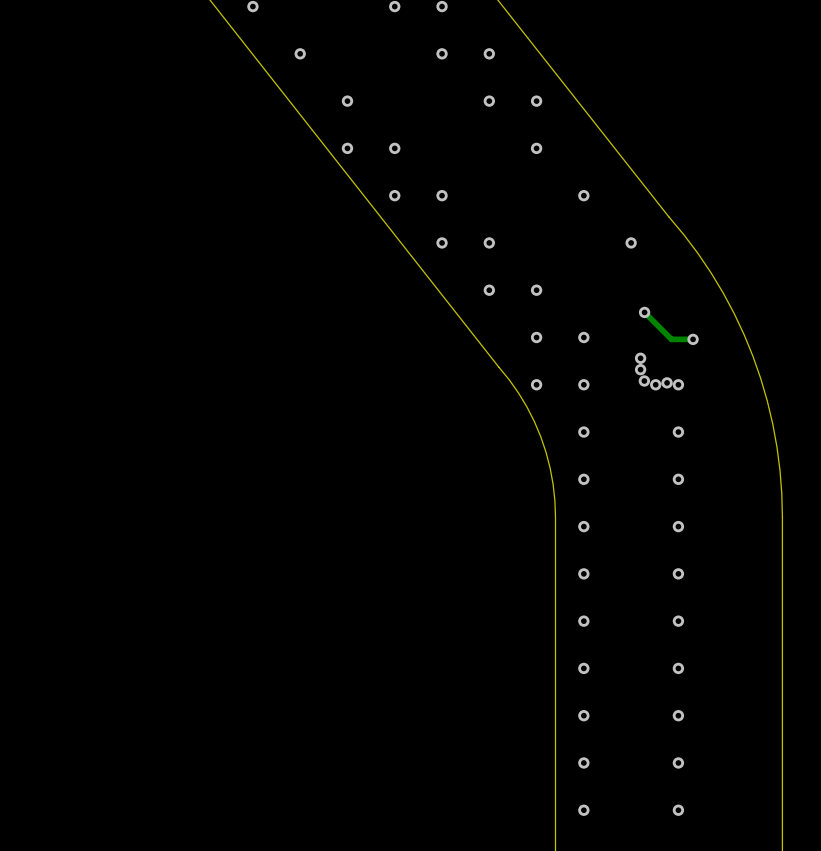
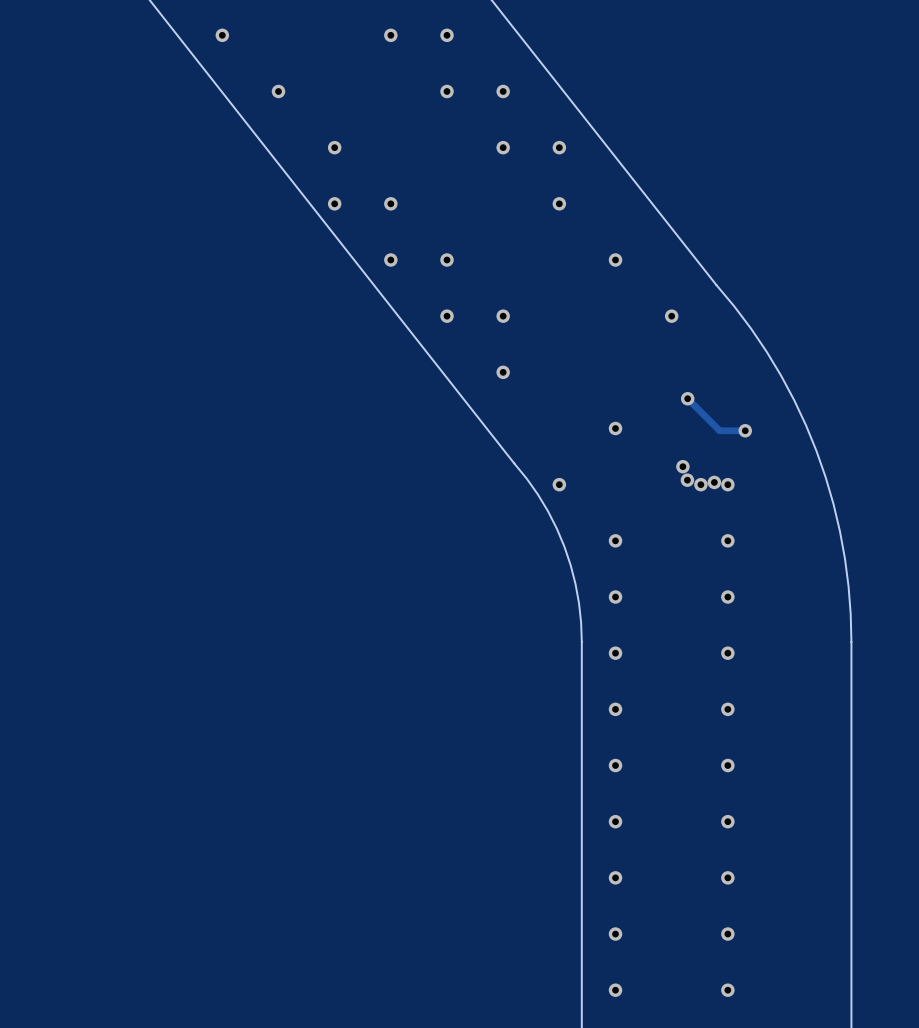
via: (536, 290) -> none
via: (536, 337) -> none
via: (640, 358) -> none
via: (583, 384) -> none

